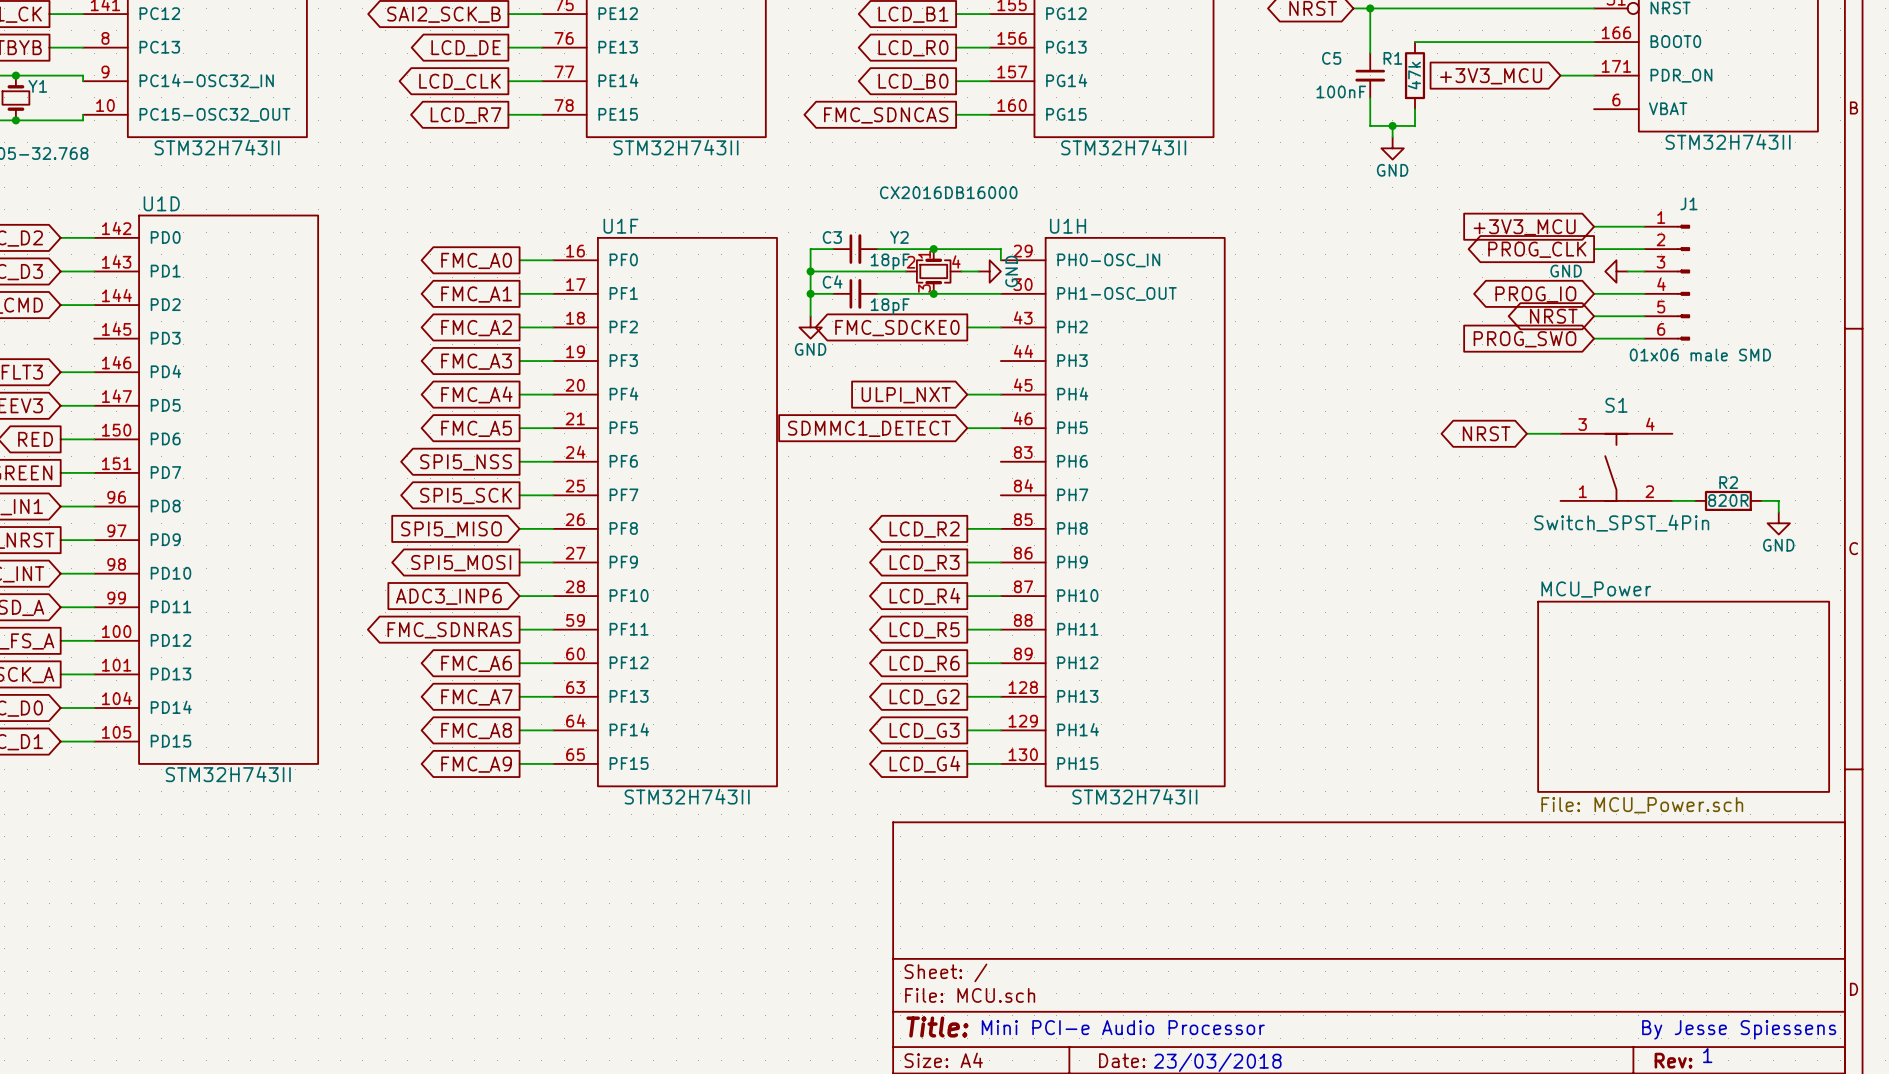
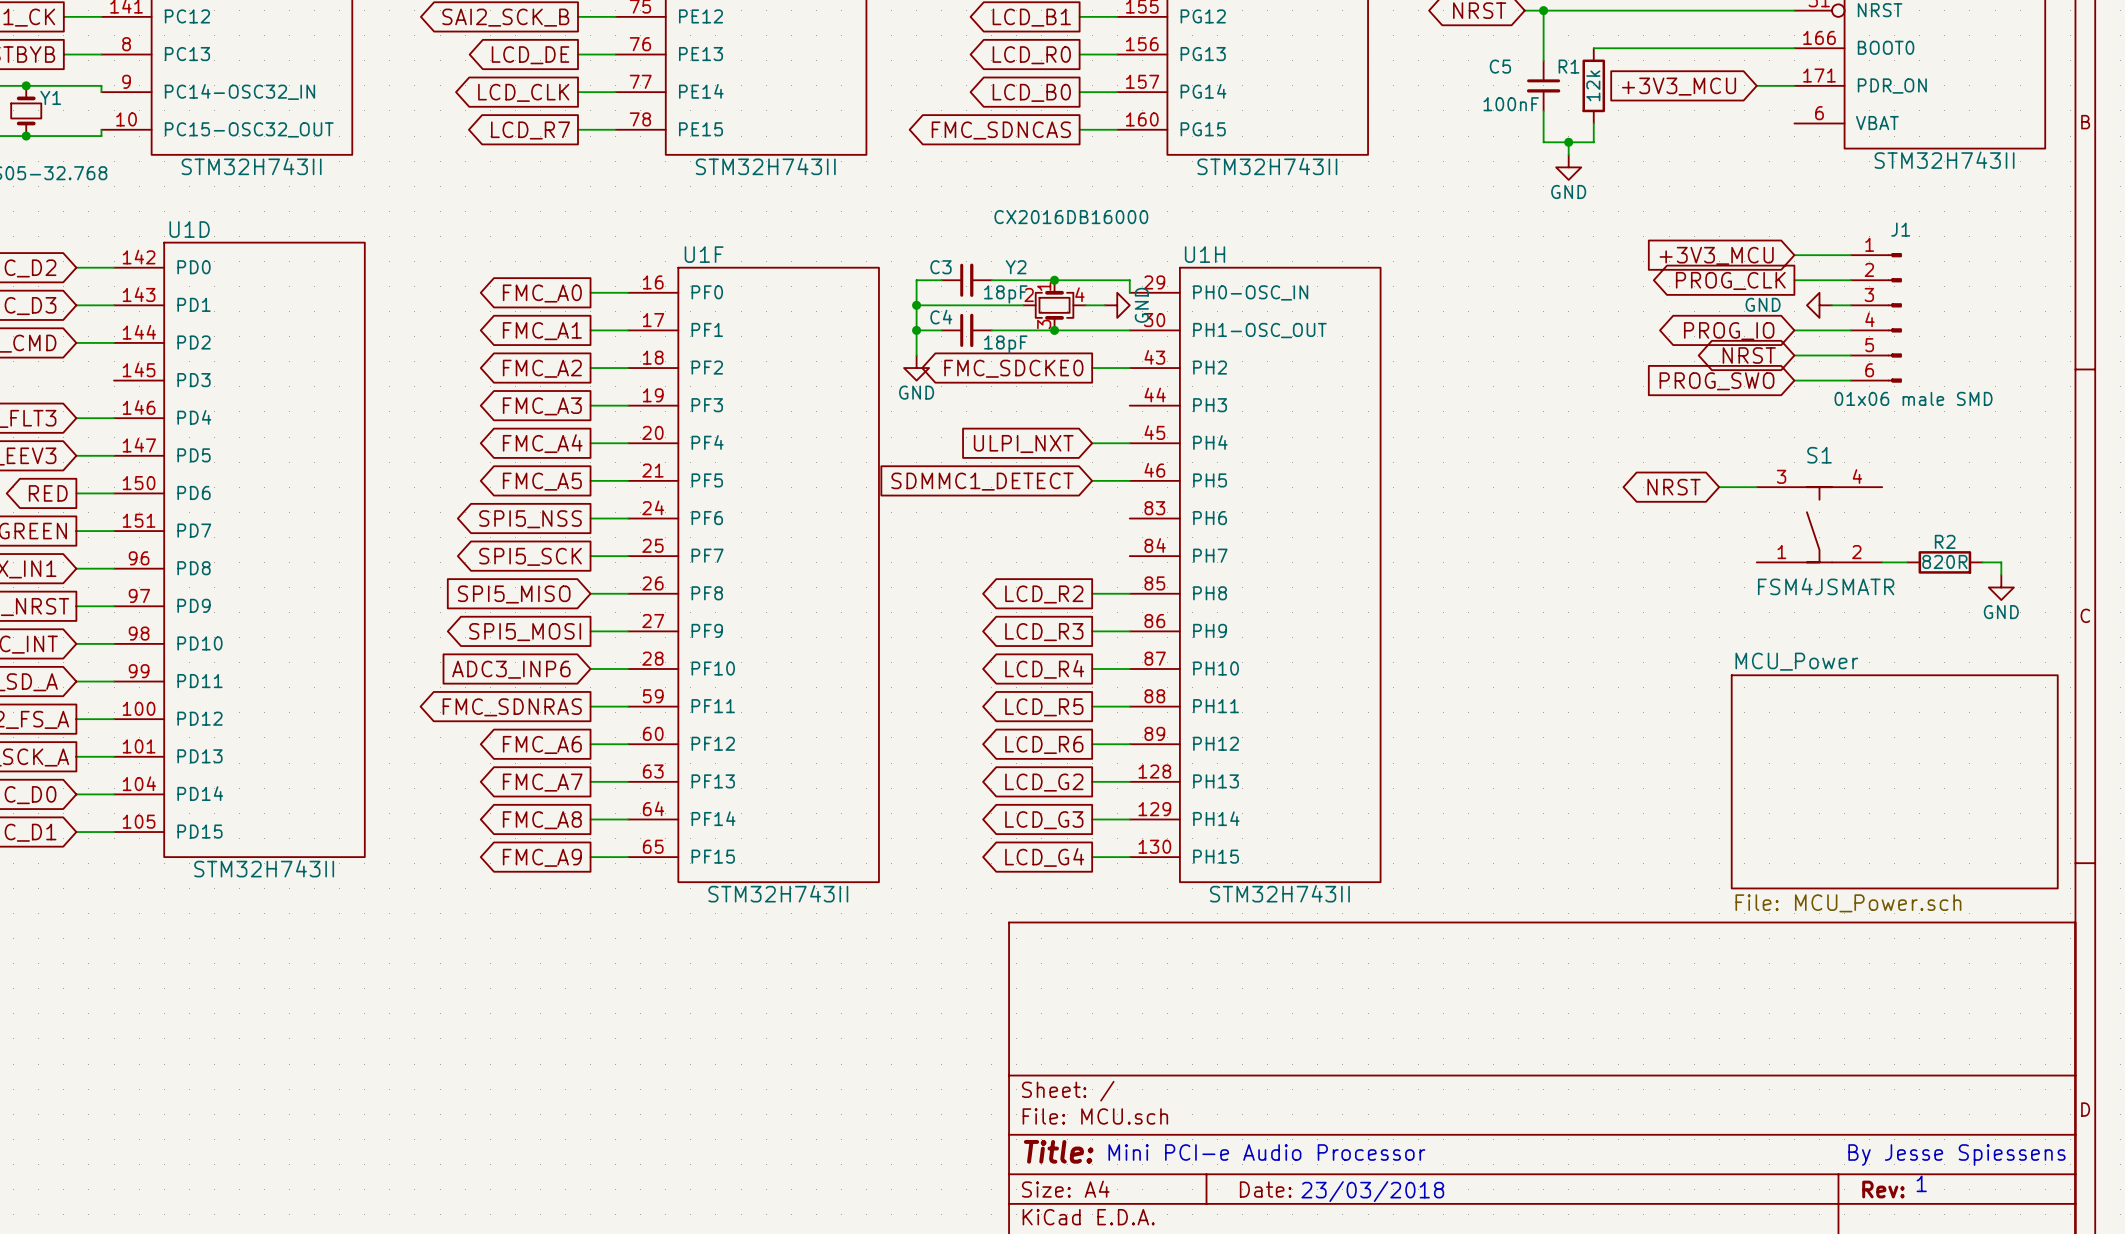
R1 value: 47k (1414, 75) -> 12k (1593, 85)
S1 value: Switch_SPST_4Pin (1621, 523) -> FSM4JSMATR (1826, 586)

